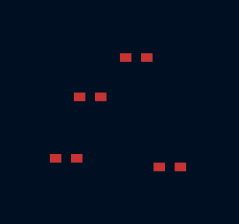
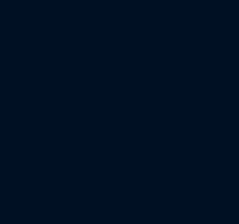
part: (136, 57) -> none
part: (90, 96) -> none
part: (66, 158) -> none
part: (169, 166) -> none

